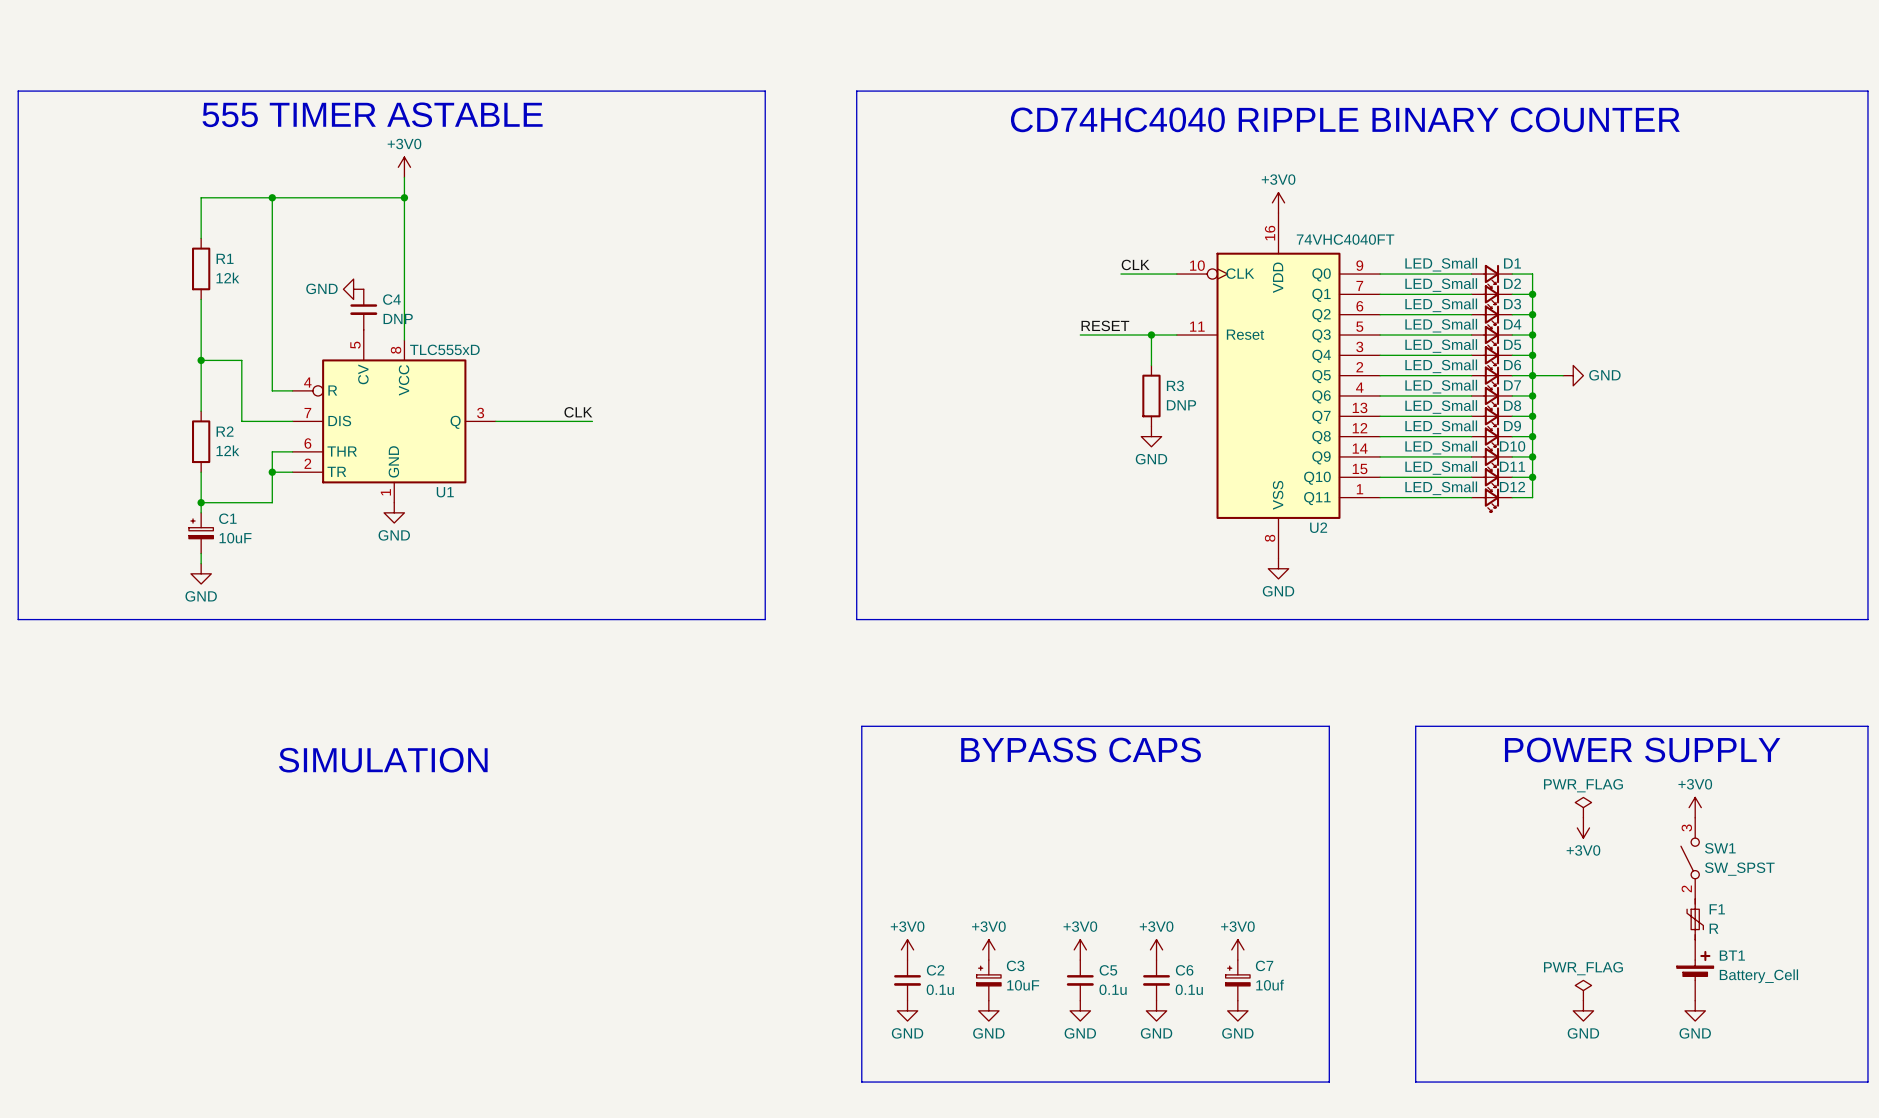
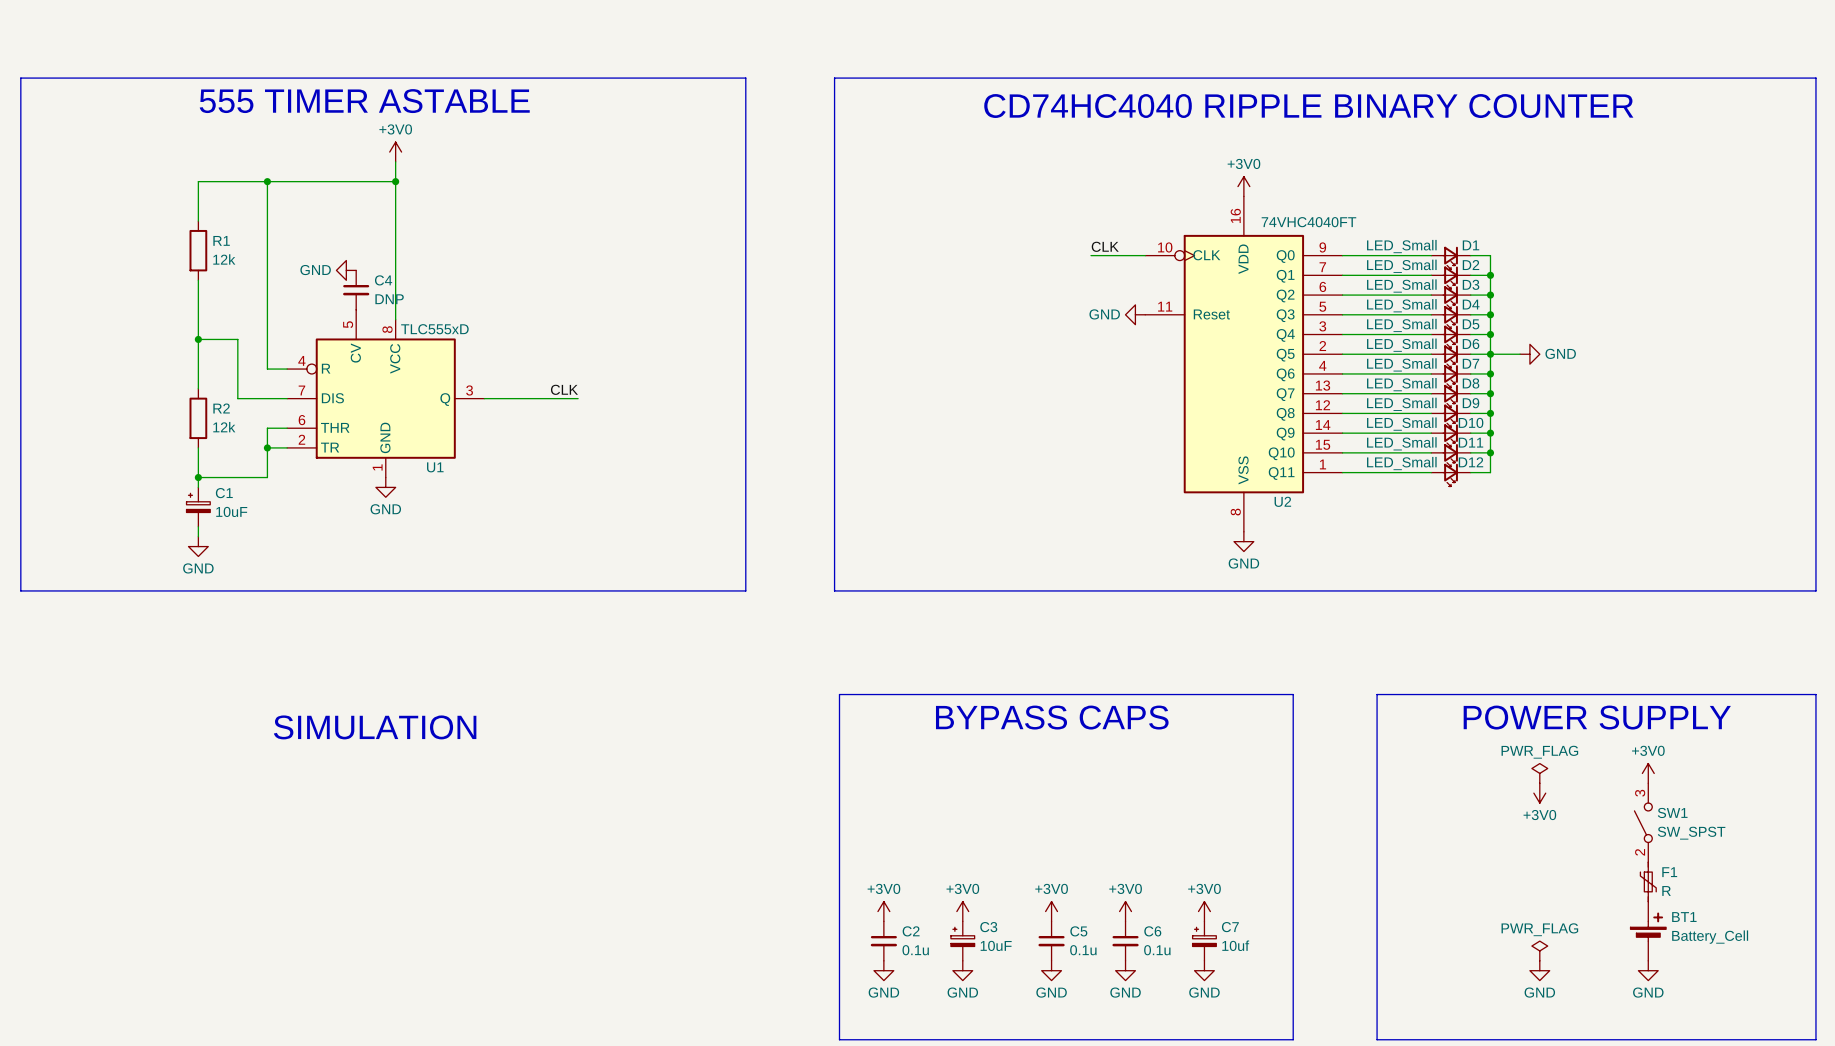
label: RESET (1105, 325) -> none
wire: (1080, 335) (1176, 335) -> none
wire: (1151, 335) (1151, 365) -> none
junction: (1151, 335) -> none
R3: DNP (1151, 395) -> none
power symbol rotation: 0° (1151, 436) -> 90° clockwise (1135, 314)
power symbol position: GND (1151, 436) -> GND (1135, 314)

